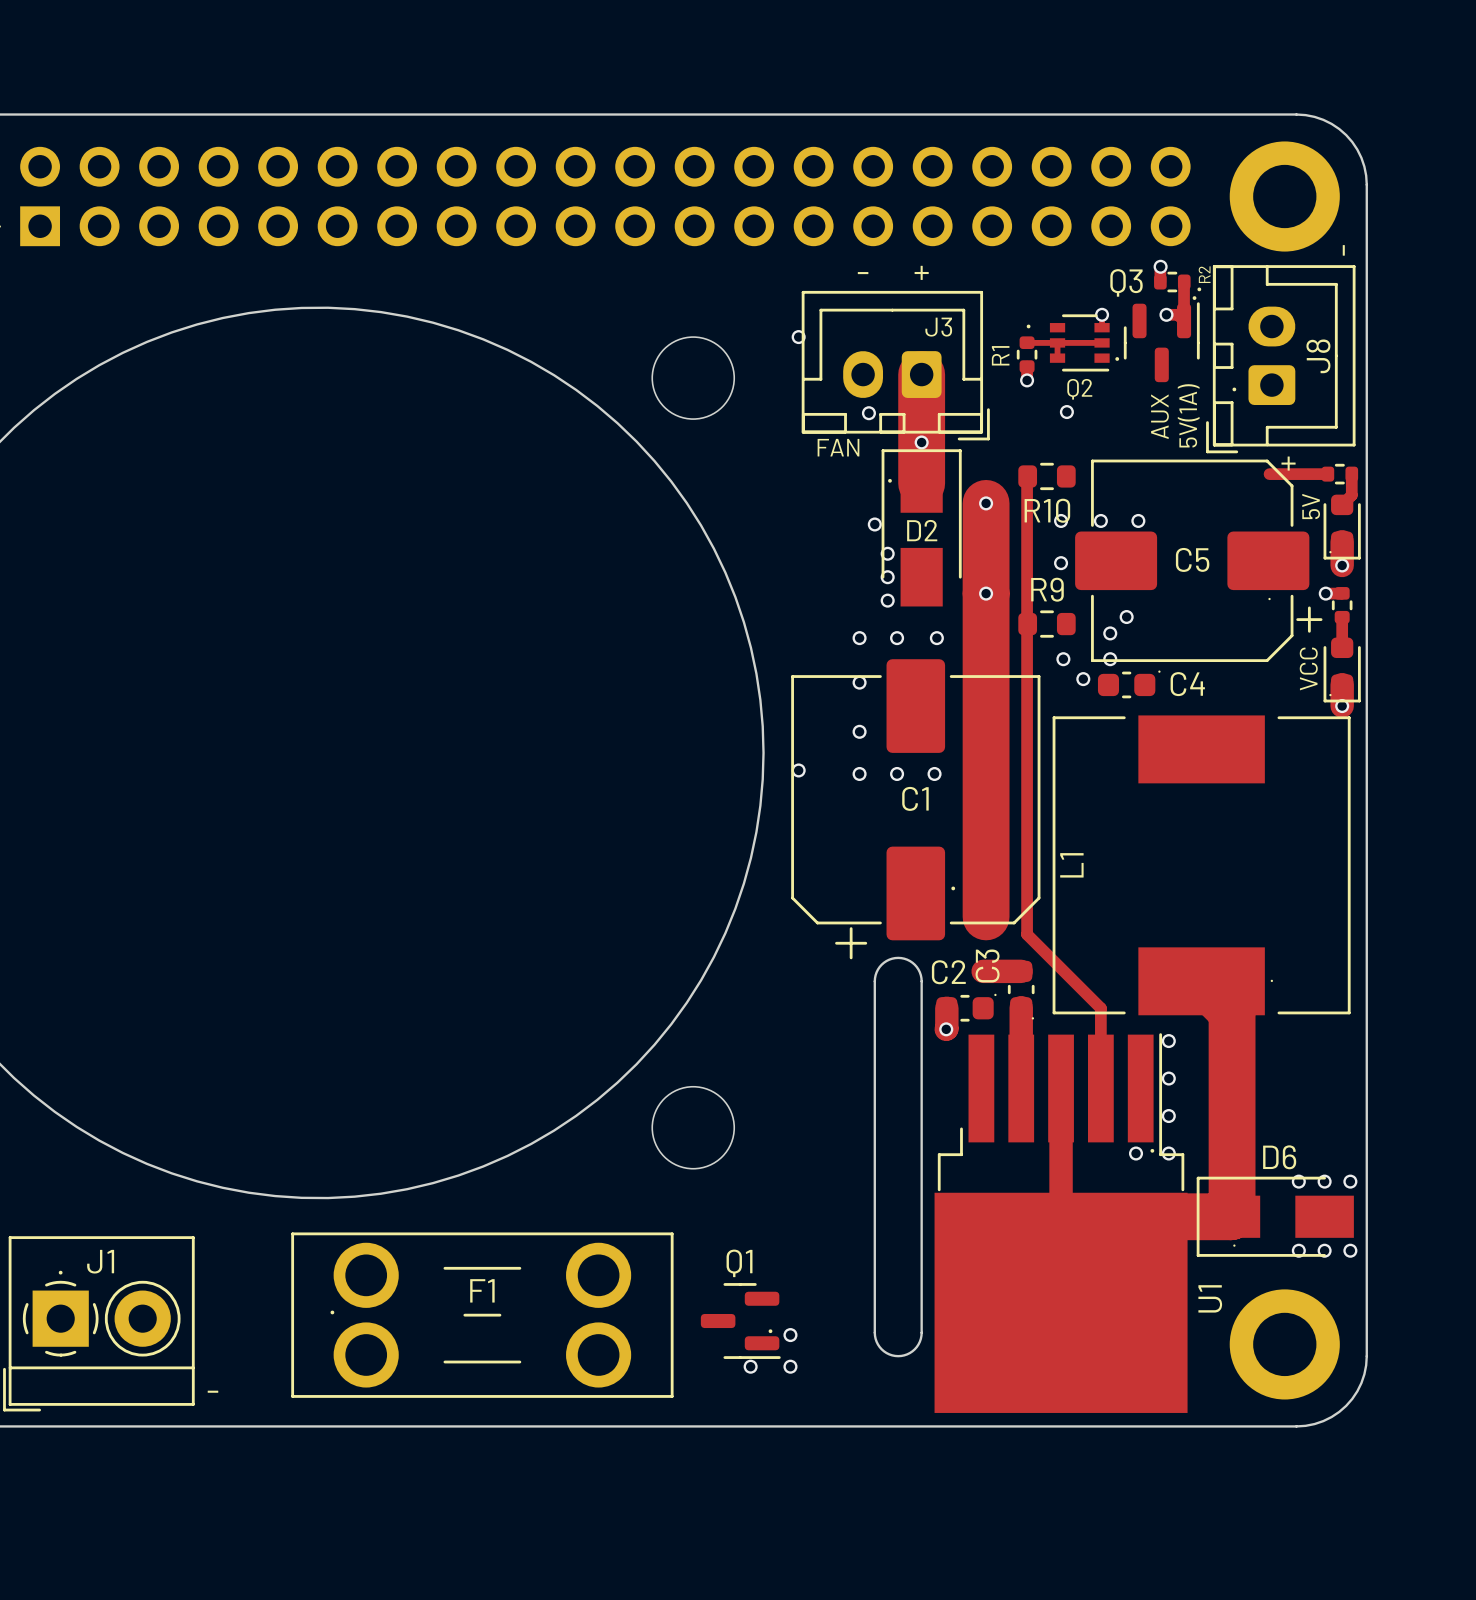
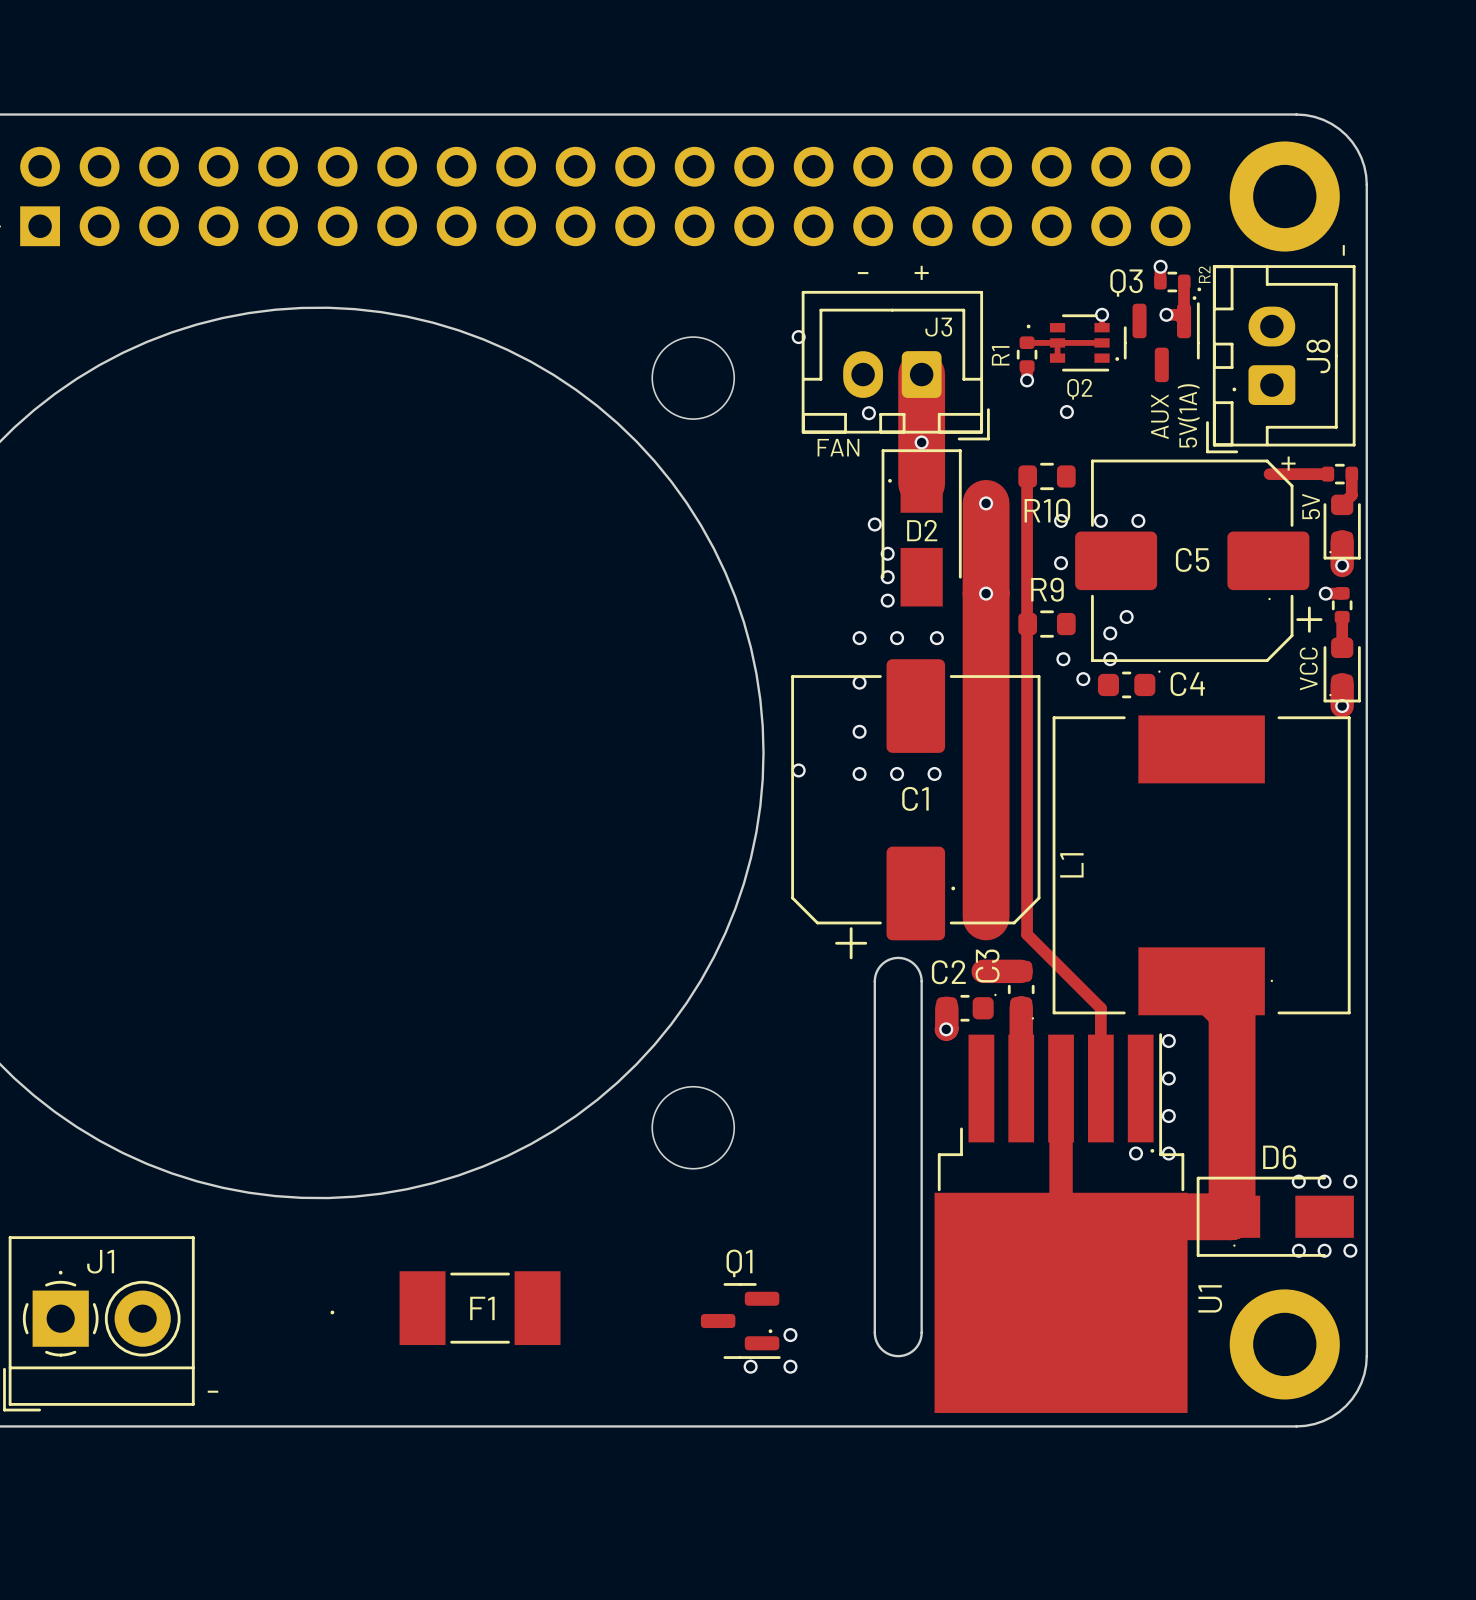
F1 footprint: [291, 1232, 674, 1398] -> [399, 1271, 561, 1346]

